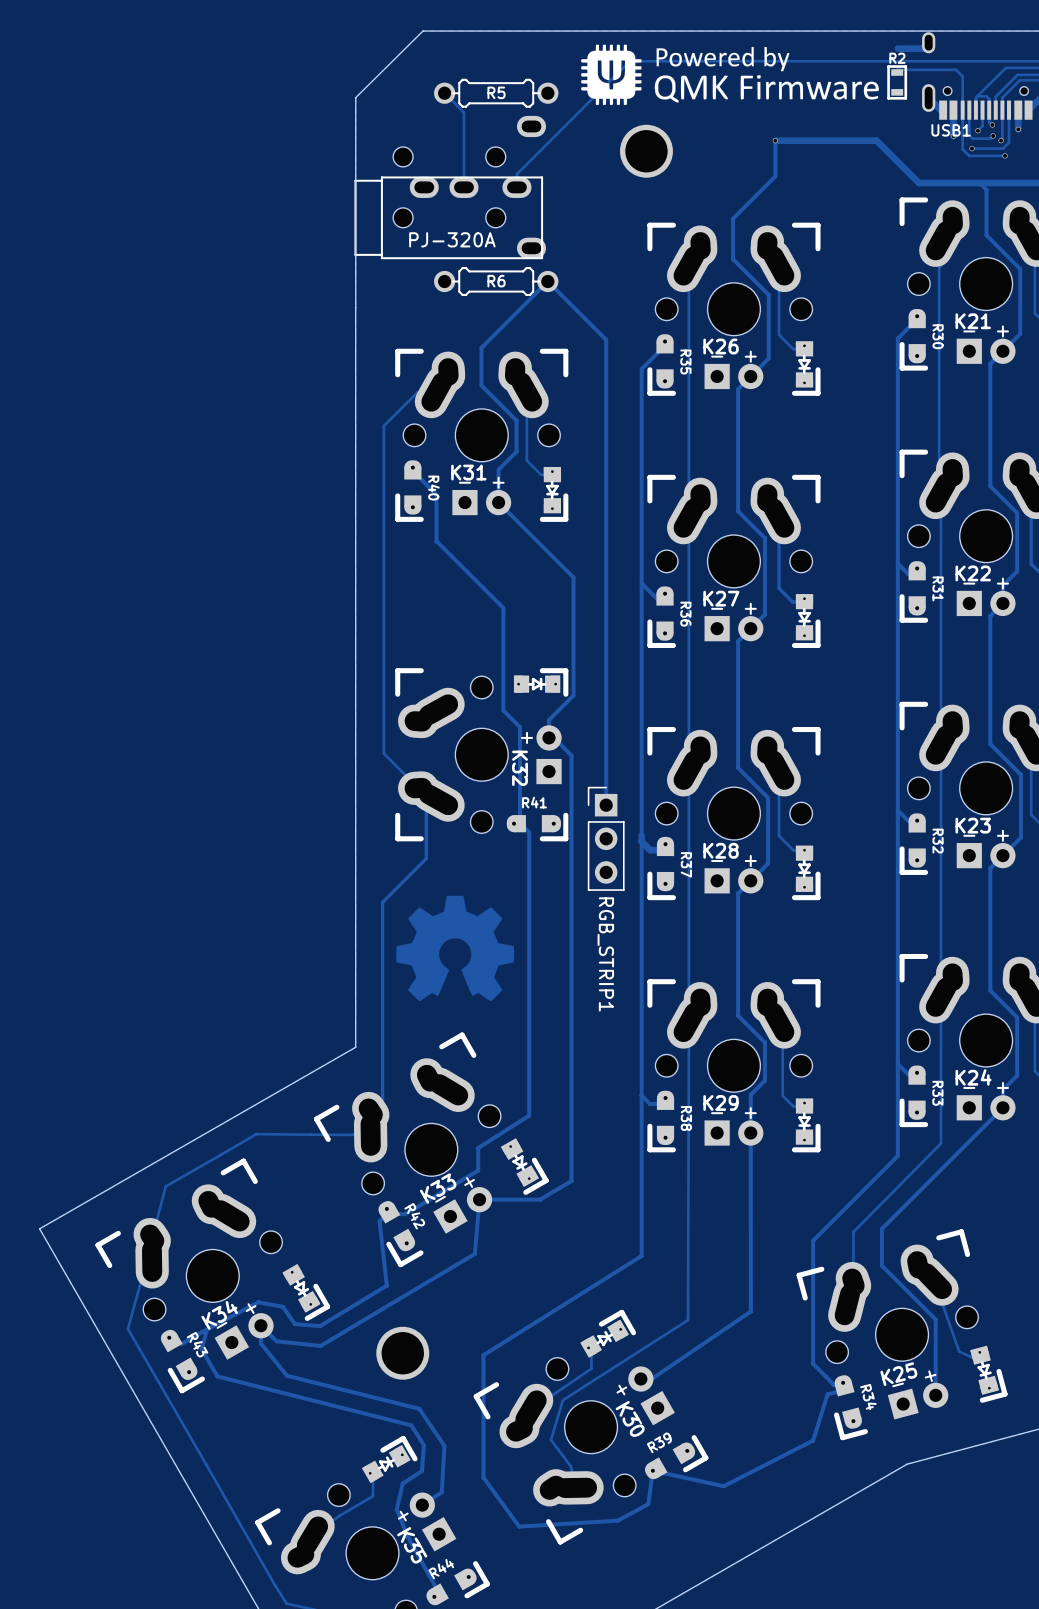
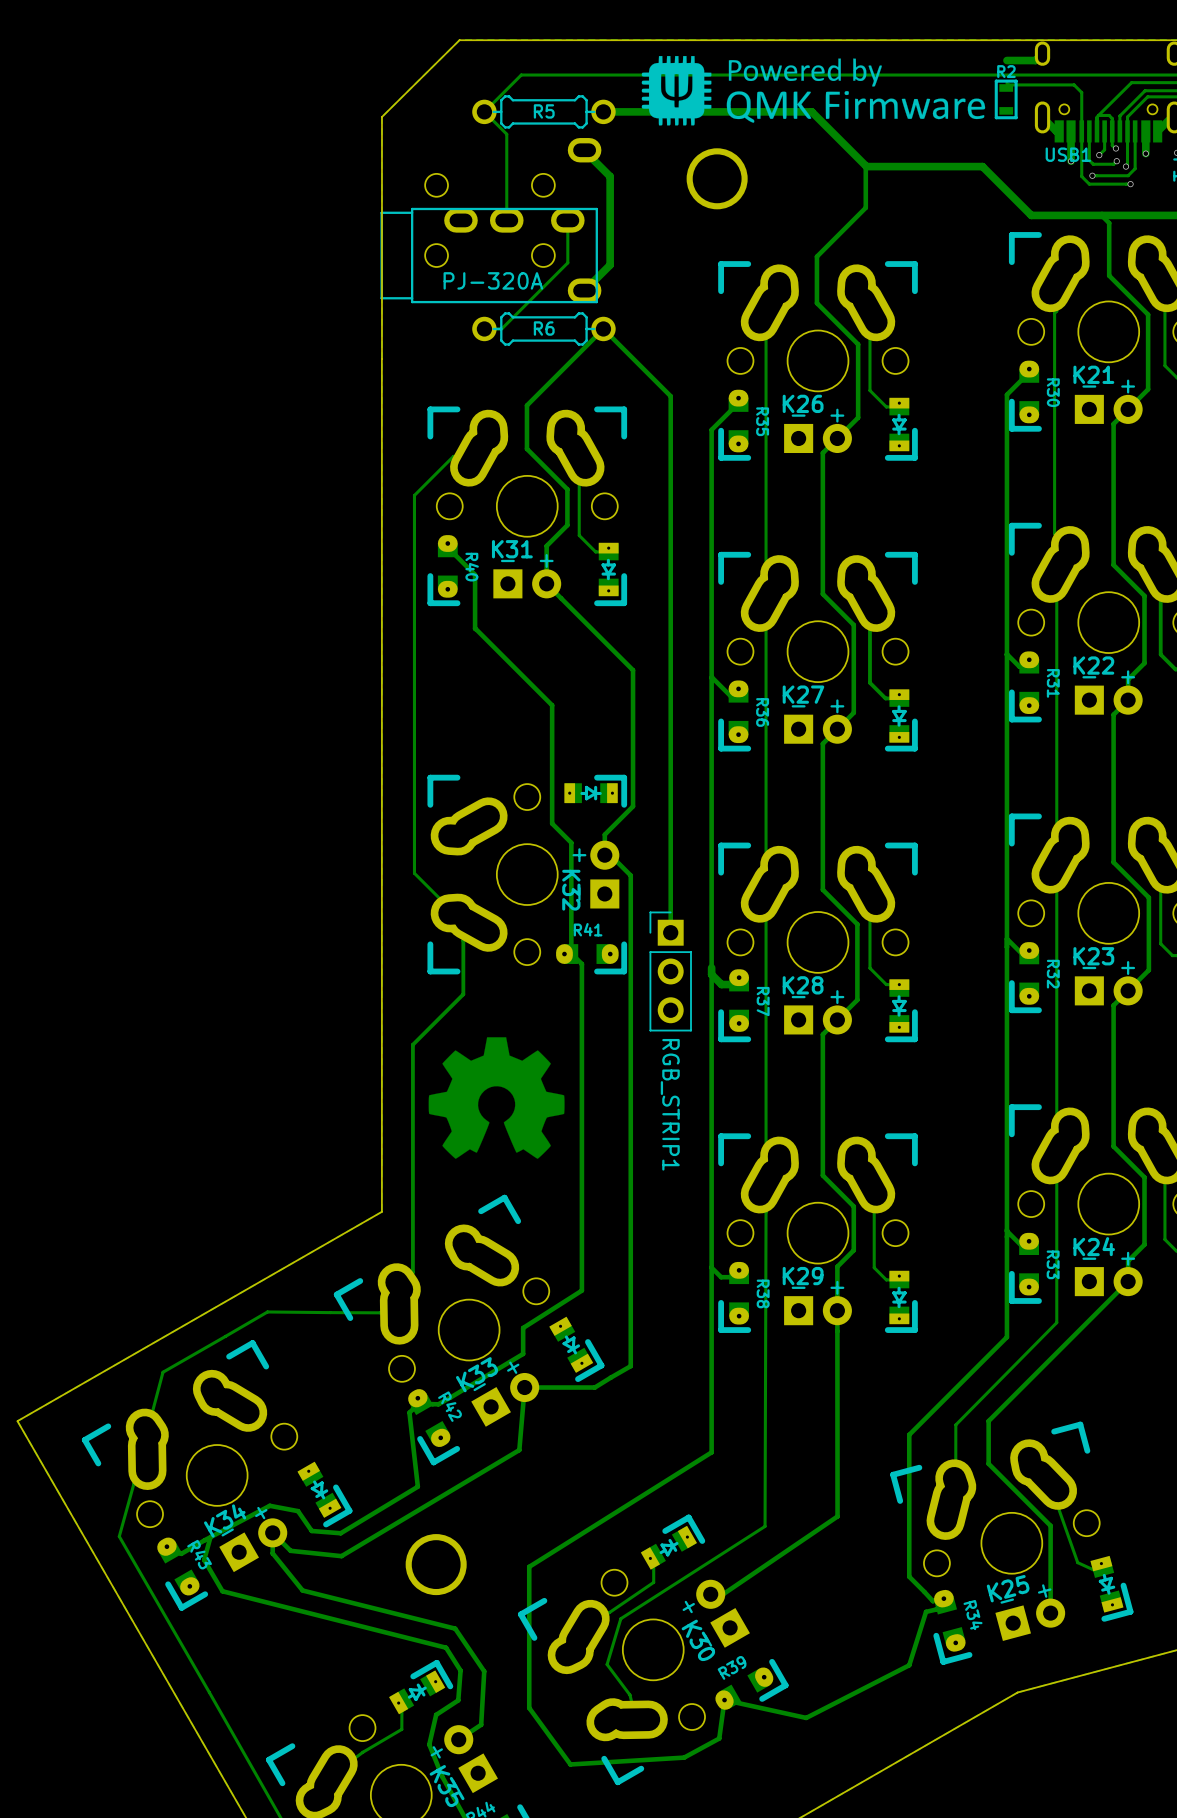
track: (629, 61) (516, 174) (516, 187) -> (697, 75) (521, 75) (484, 111)
track: none -> (603, 111) (811, 111) (866, 166)
track: none -> (584, 150) (610, 176) (610, 265) (584, 290)
via: (775, 140) -> none
track: none -> (567, 220) (567, 262) (501, 328) (484, 328)

